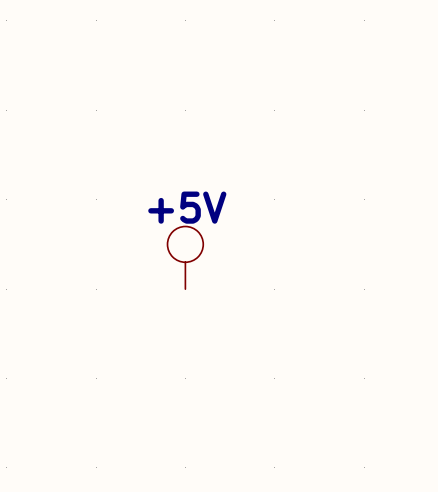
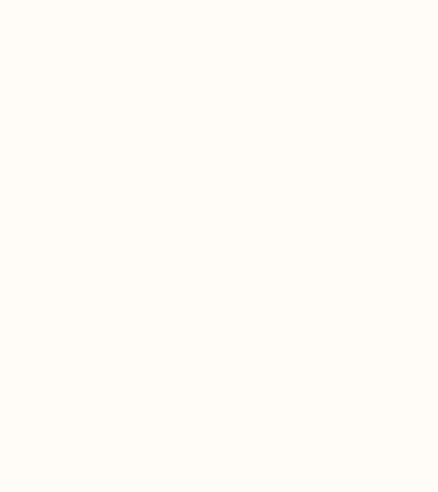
power symbol: +5V (185, 257) -> none

